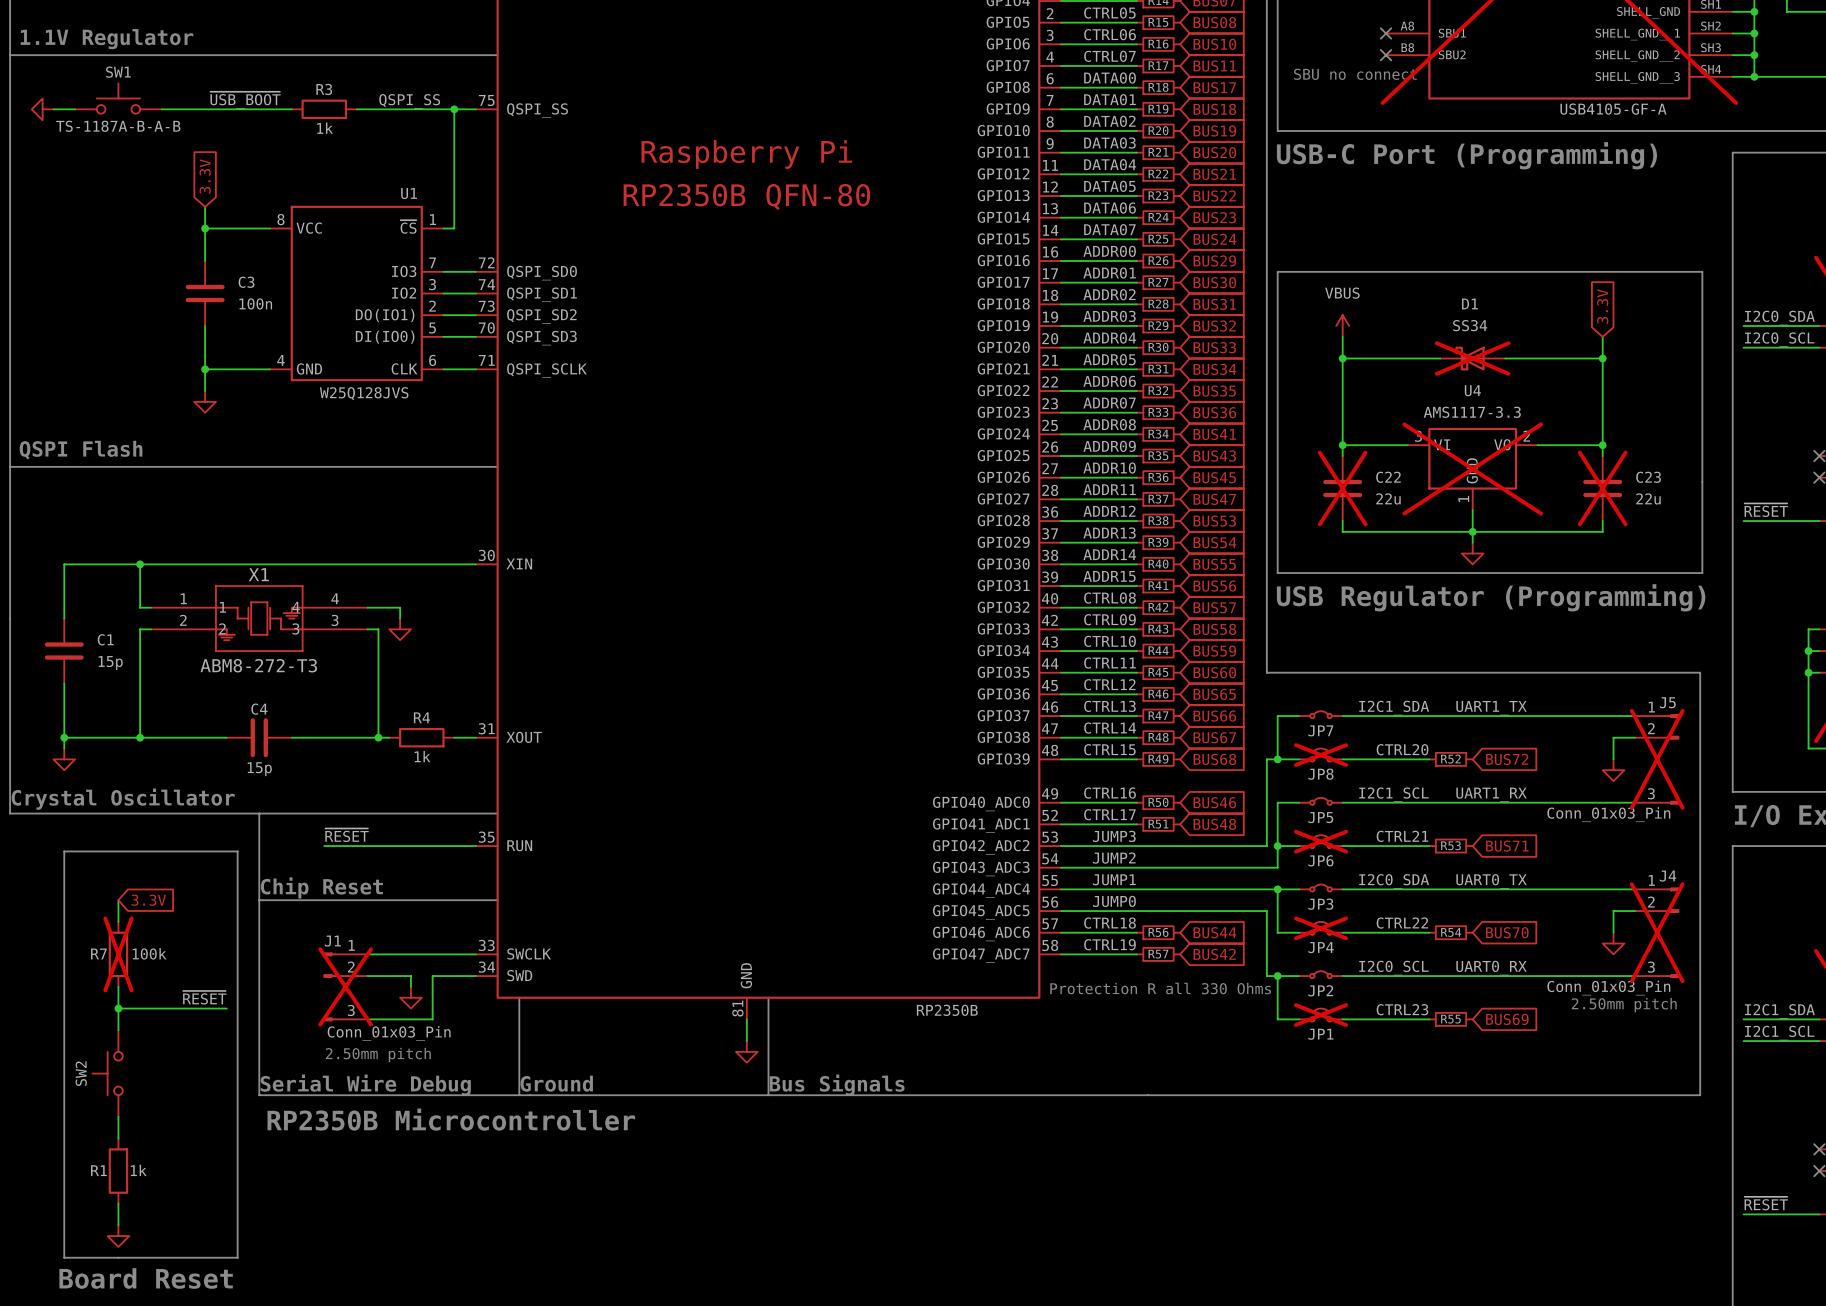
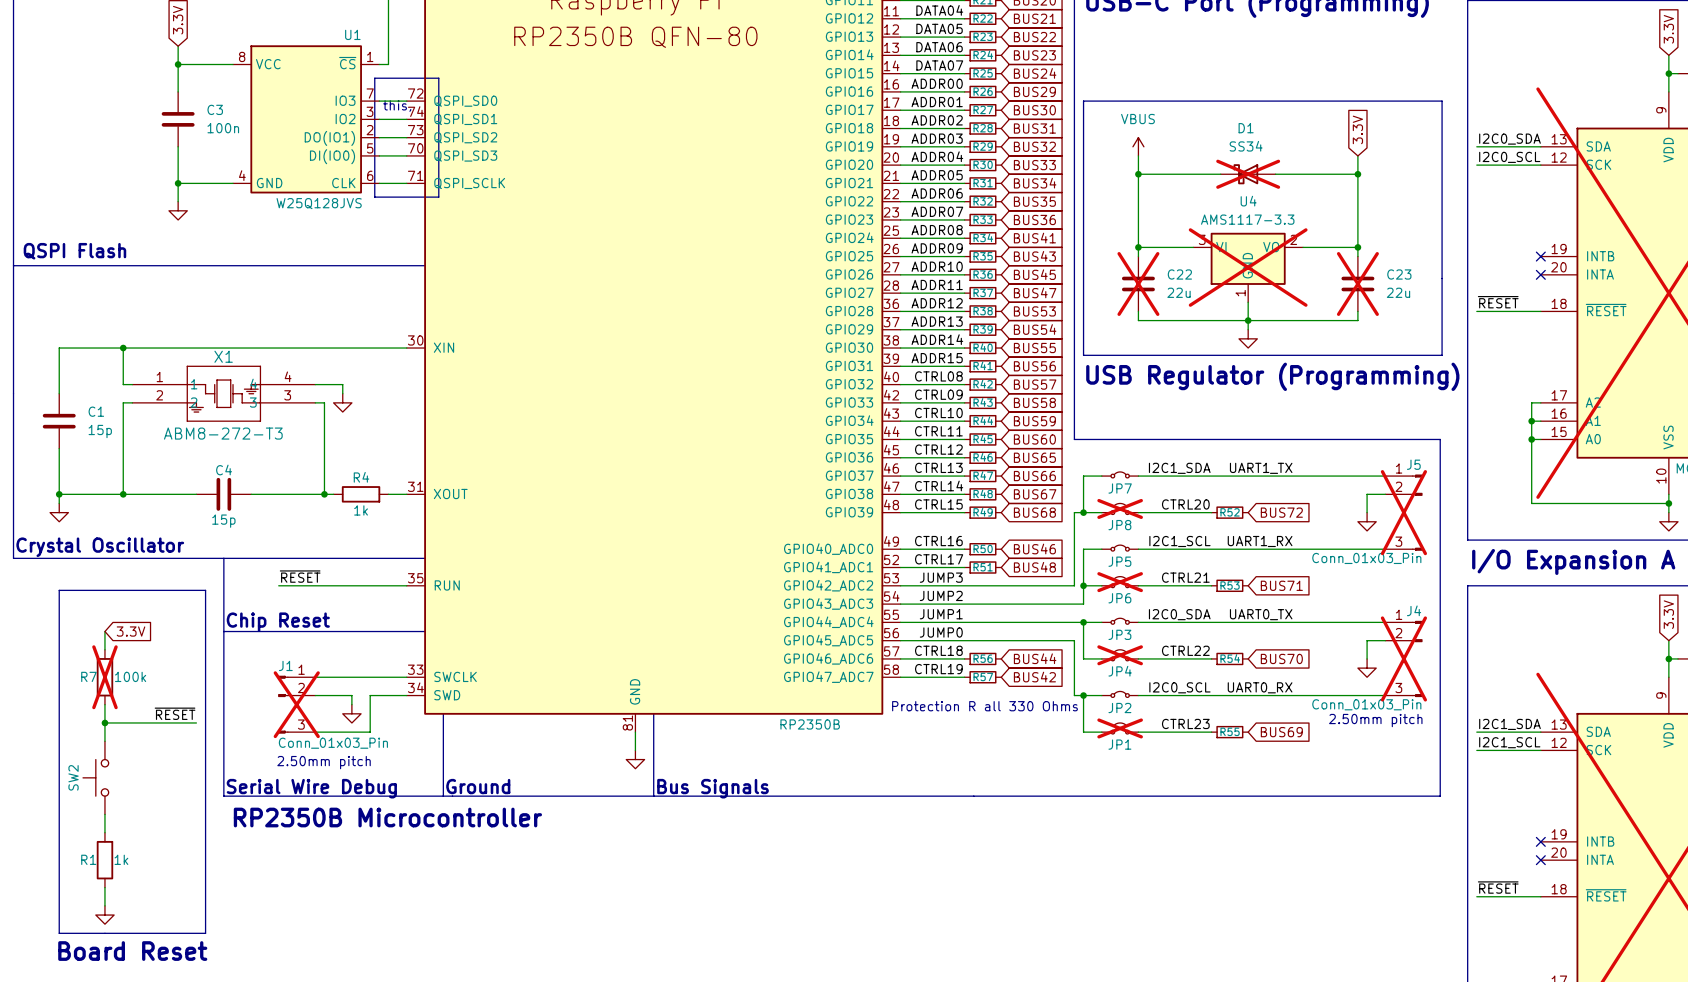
line: none -> (374, 78) (438, 78) (438, 197) (374, 197) (374, 78)
text: none -> this, (397, 106)

